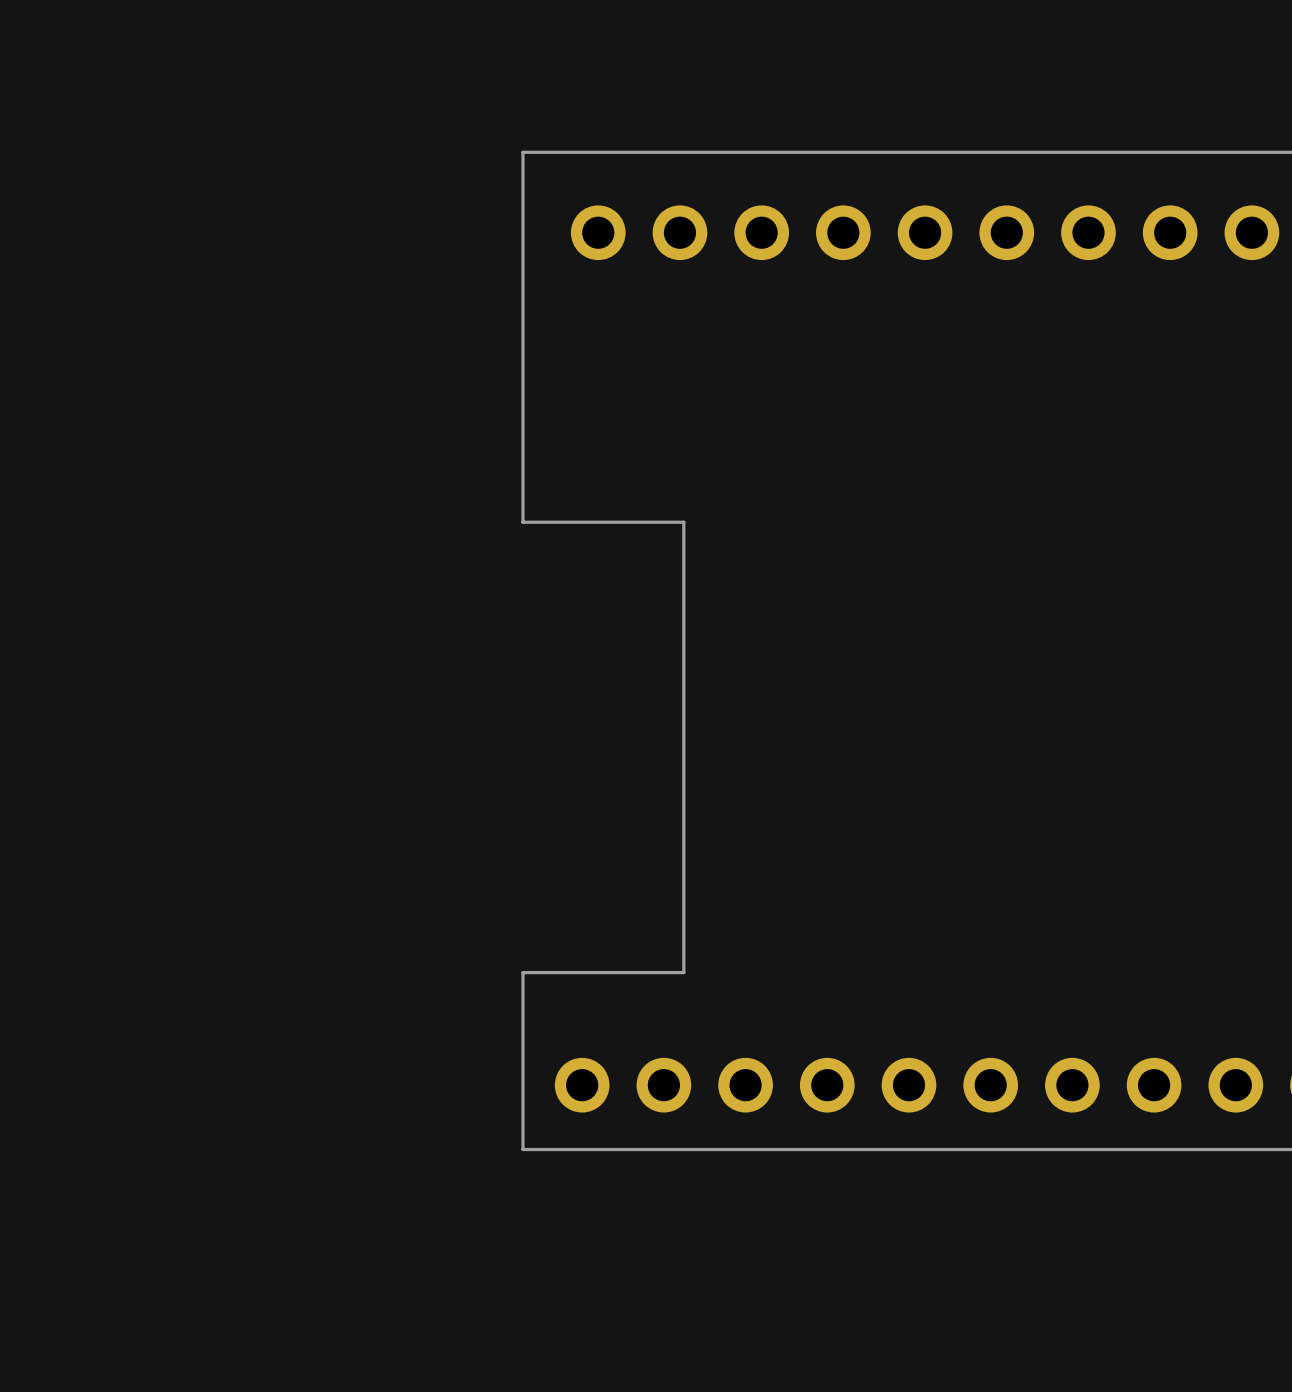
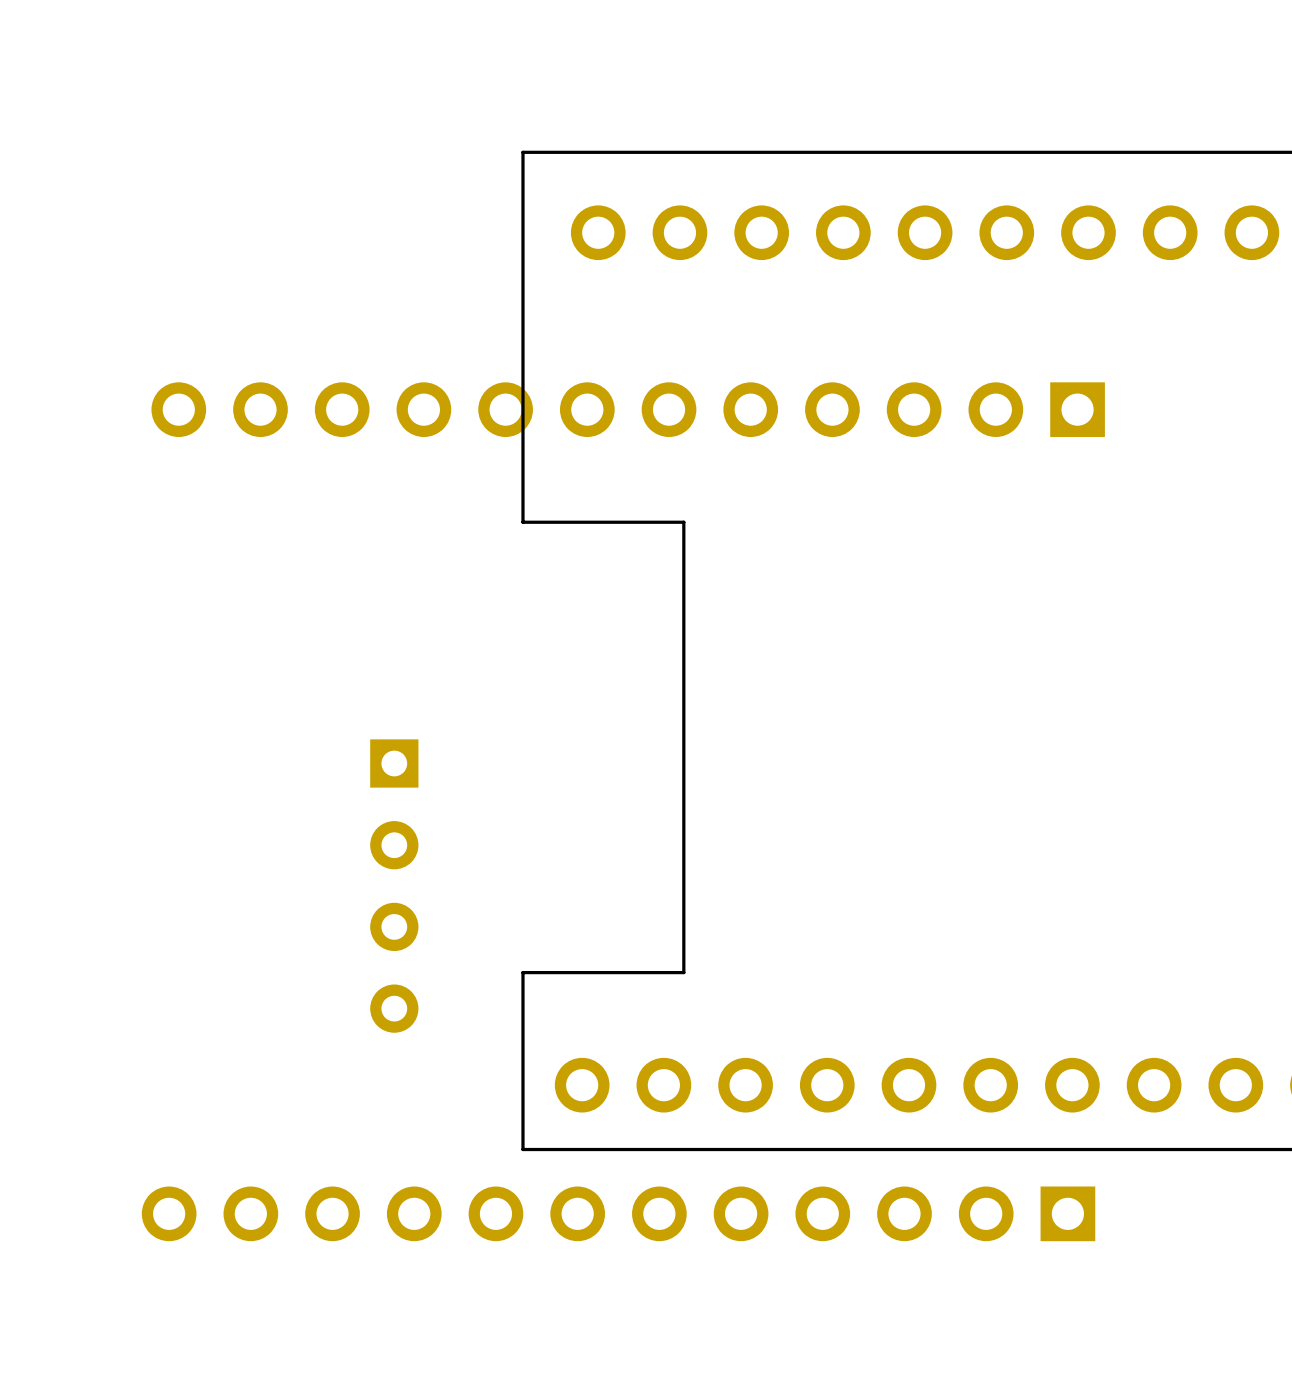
part: none -> (628, 409)
part: none -> (394, 886)
part: none -> (618, 1213)

